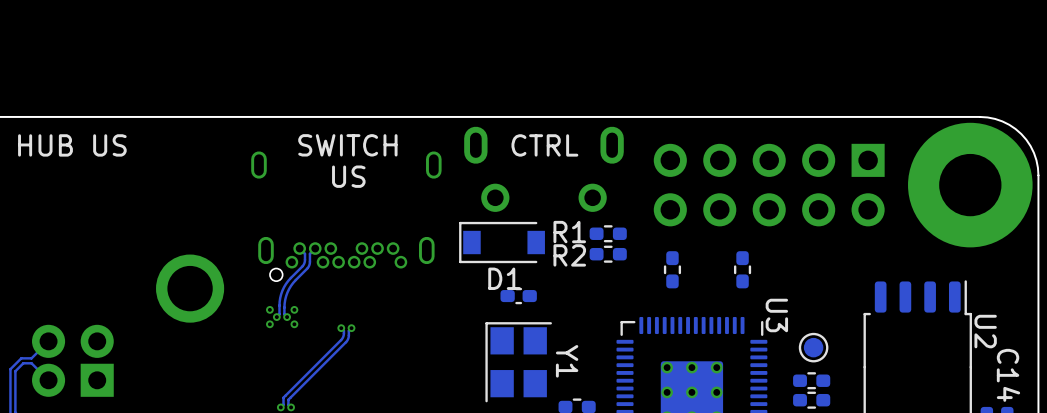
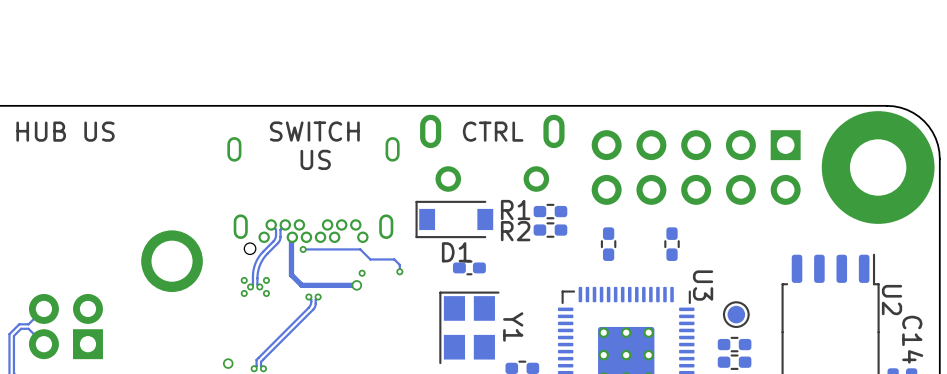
track: none -> (292, 237) (291, 274) (301, 285) (356, 285)
via: none -> (303, 249)
track: none -> (303, 249) (360, 249) (370, 259) (394, 259) (399, 264) (399, 271)
via: none -> (399, 271)
via: none -> (362, 273)
via: none -> (356, 285)
via: none -> (228, 363)

